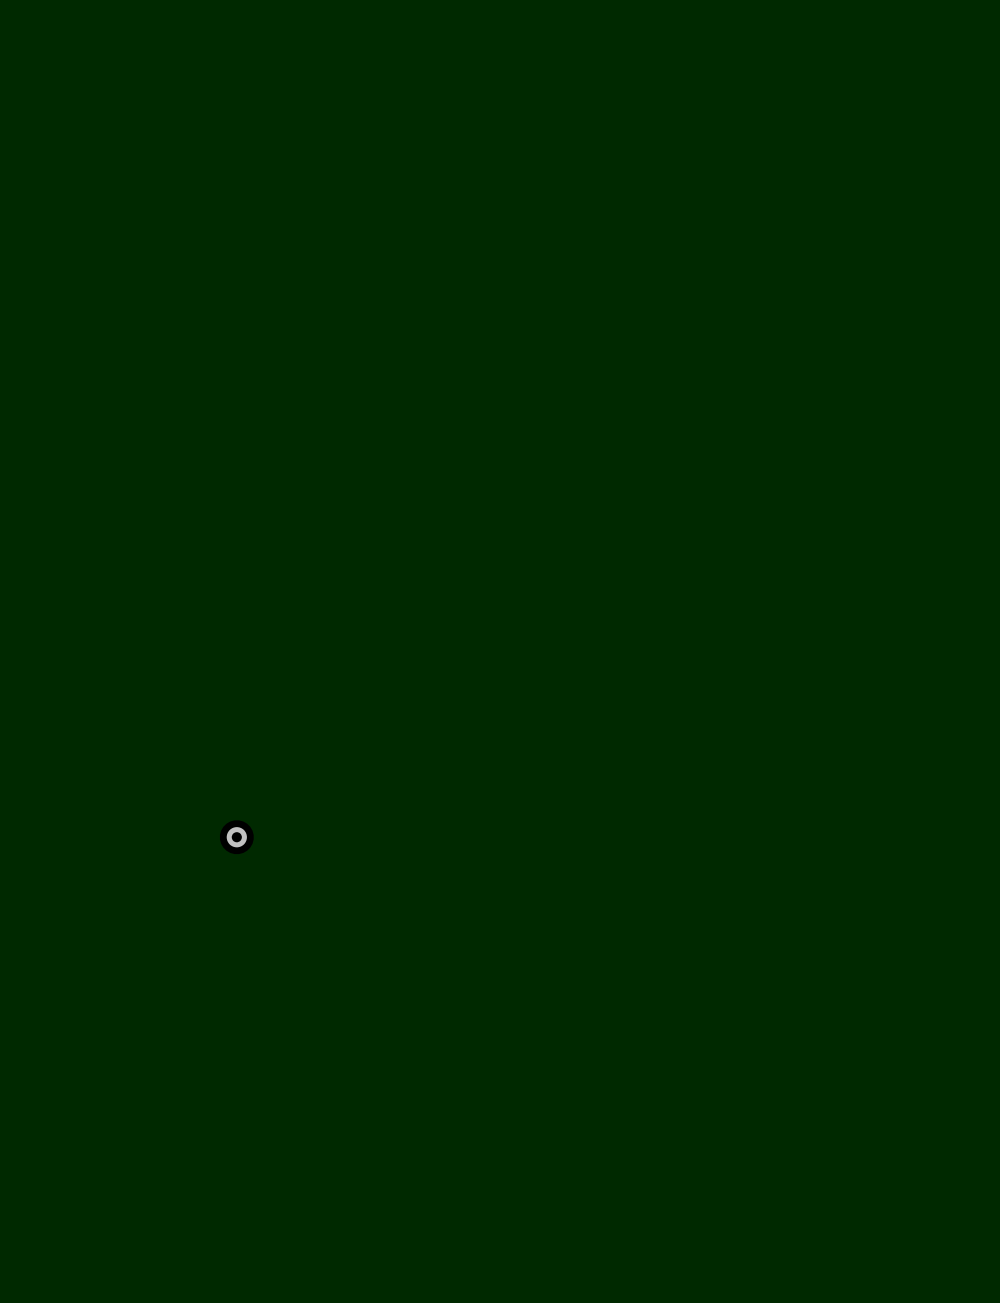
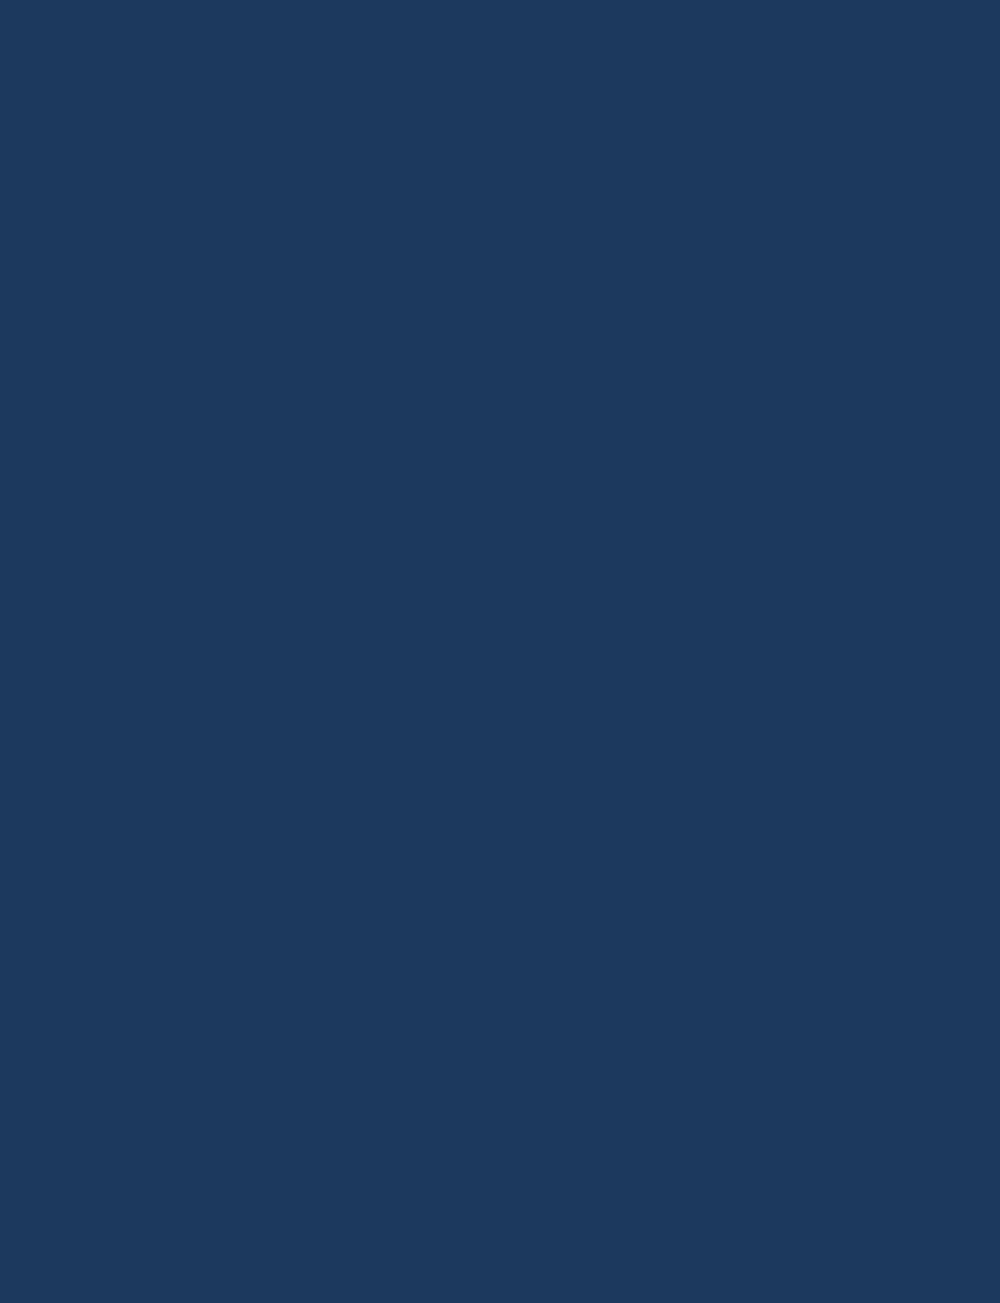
via: (236, 837) -> none

